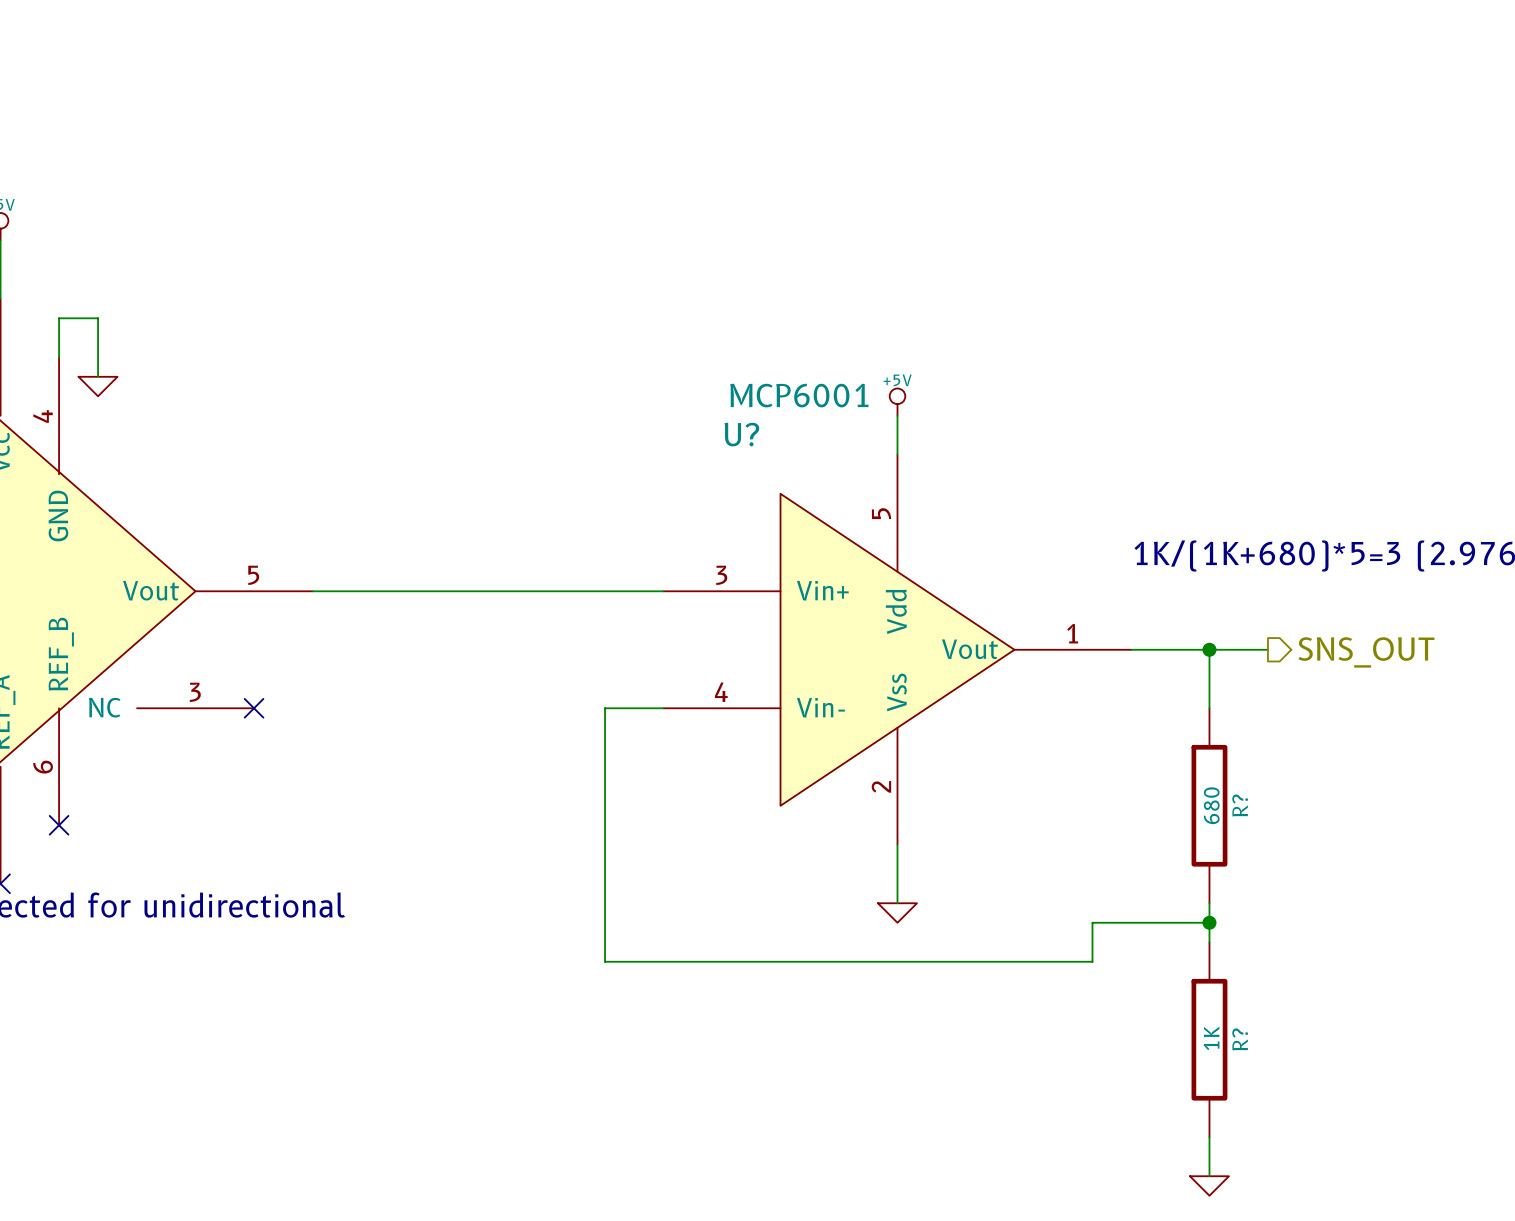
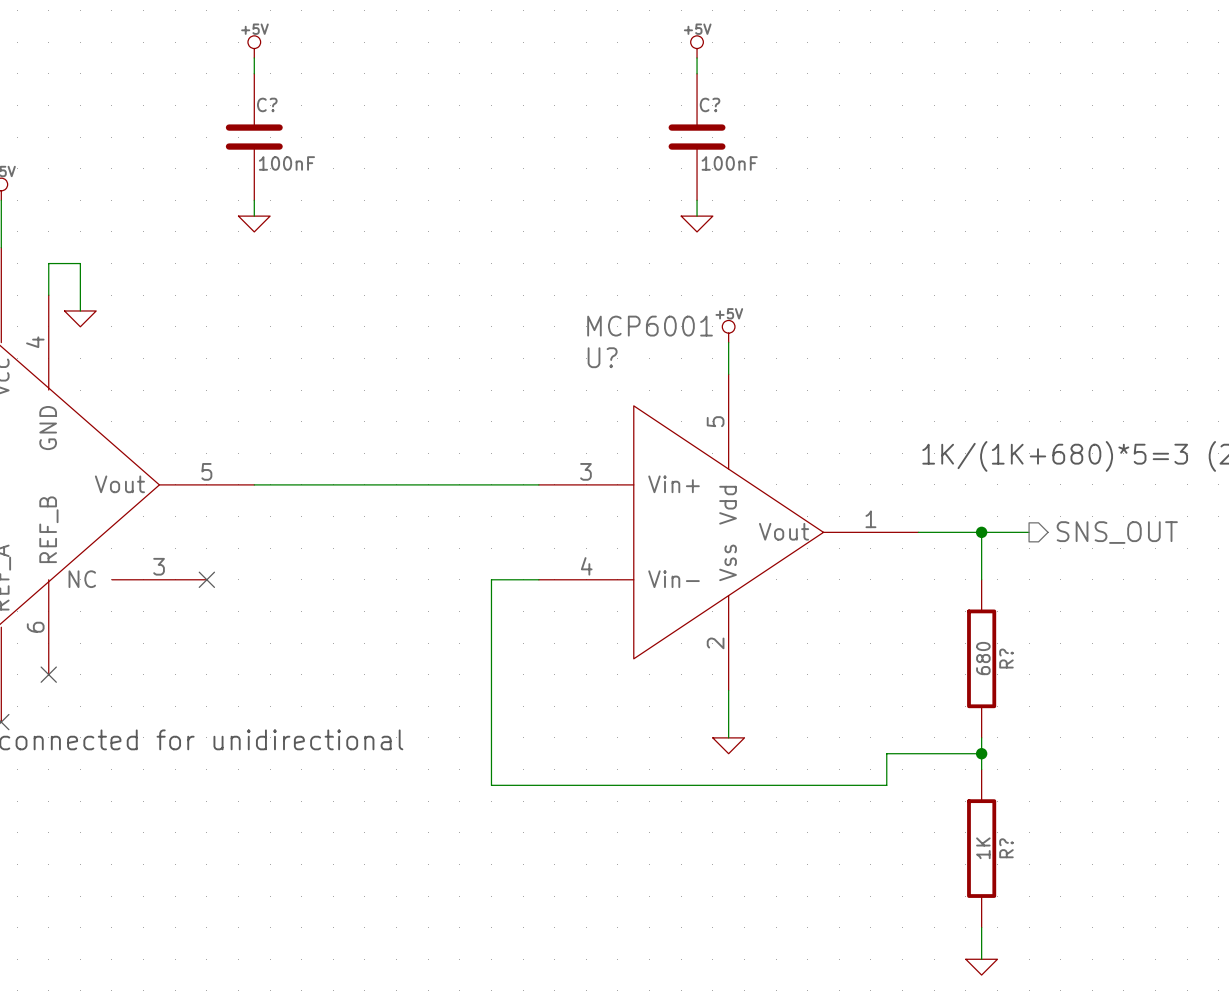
power symbol: none -> +5V (254, 46)
power symbol: none -> +5V (697, 46)
wire: none -> (254, 58) (254, 73)
wire: none -> (697, 58) (697, 73)
C?: none -> 100nF (254, 137)
C?: none -> 100nF (697, 137)
wire: none -> (254, 200) (254, 216)
wire: none -> (697, 200) (697, 216)
power symbol: none -> (254, 224)
power symbol: none -> (697, 224)

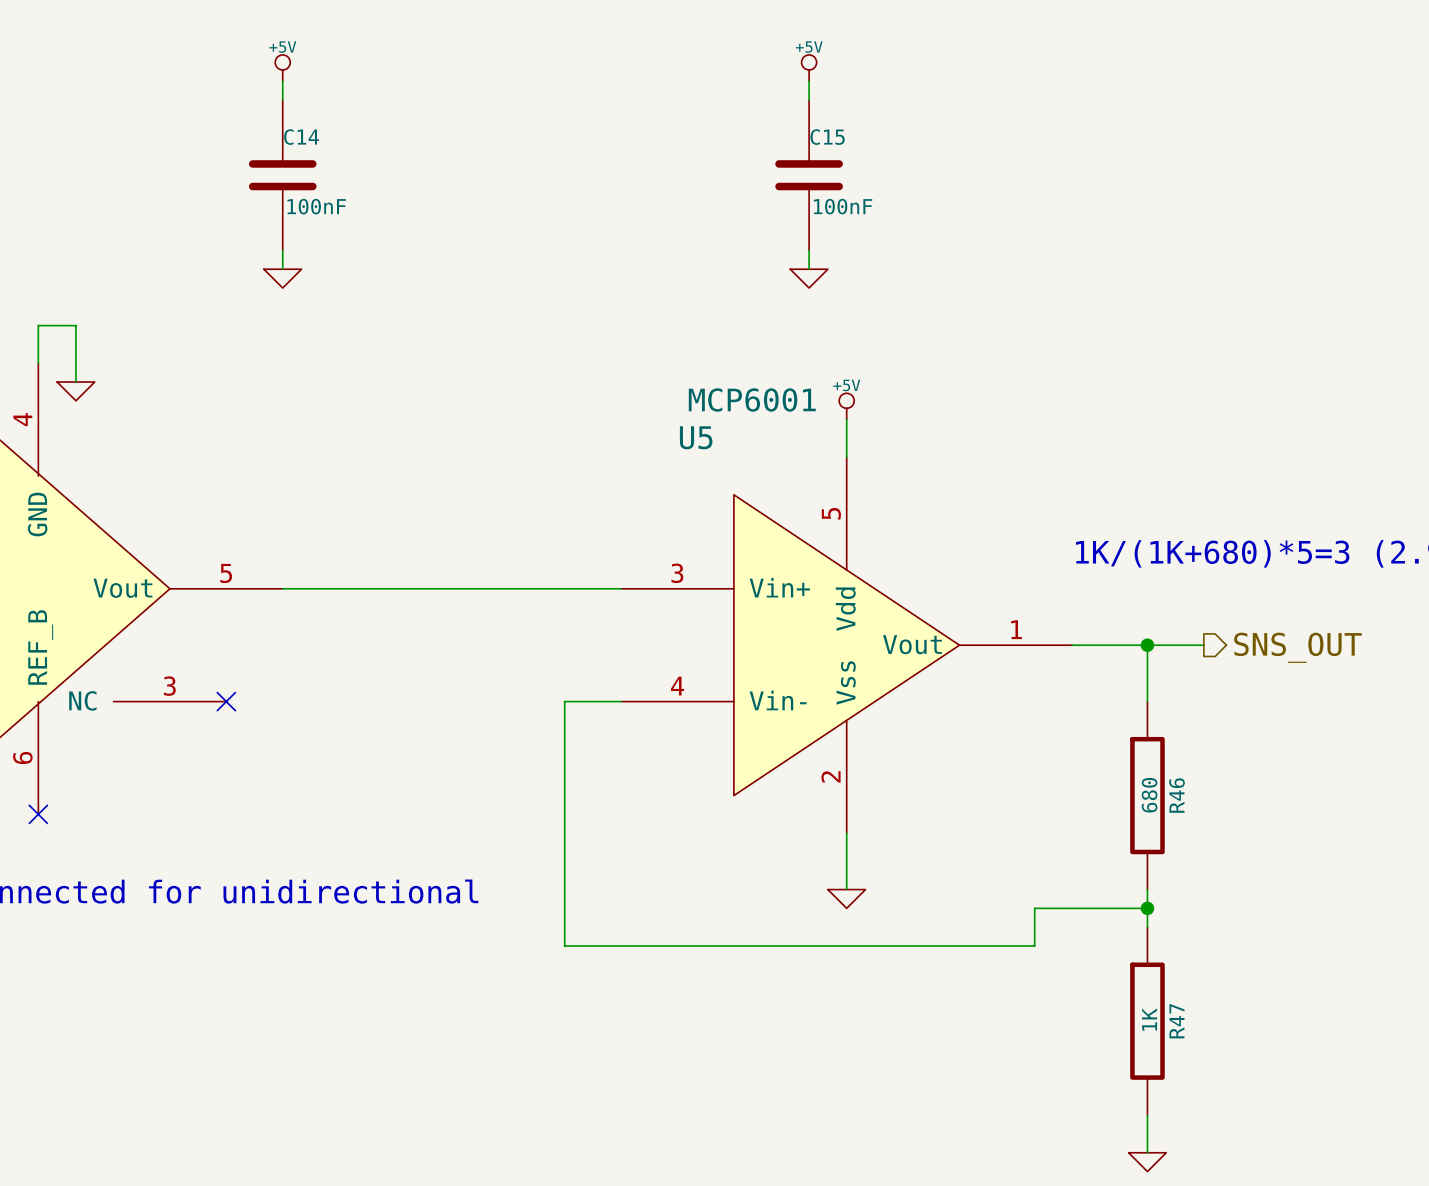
C? name: C? (267, 104) -> C14 (301, 137)
C? name: C? (710, 104) -> C15 (827, 137)
U? name: U? (602, 357) -> U5 (696, 437)
R? name: R? (1006, 658) -> R46 (1176, 795)
R? name: R? (1006, 848) -> R47 (1176, 1021)

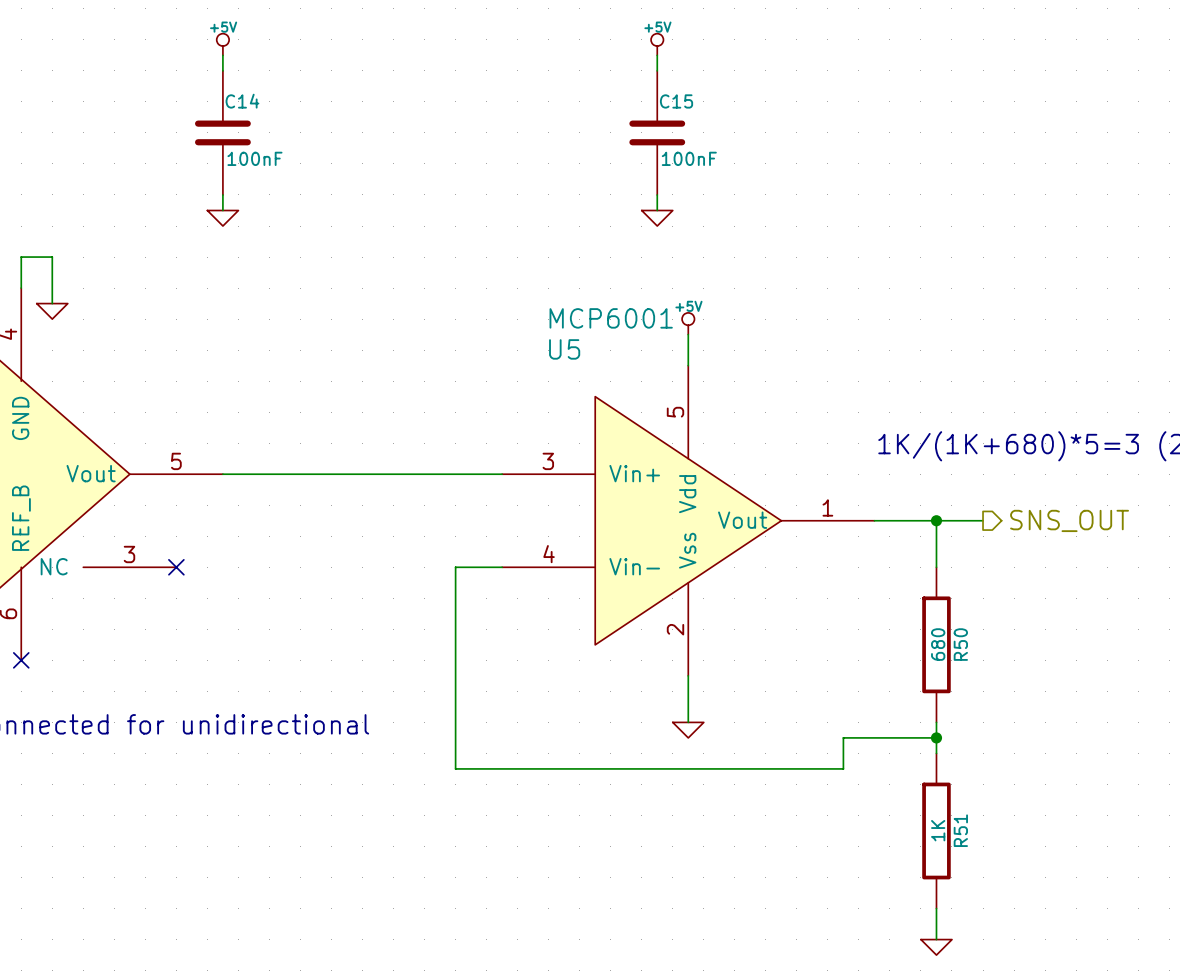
R46 name: R46 (1176, 795) -> R50 (960, 644)
R47 name: R47 (1176, 1021) -> R51 (960, 830)

